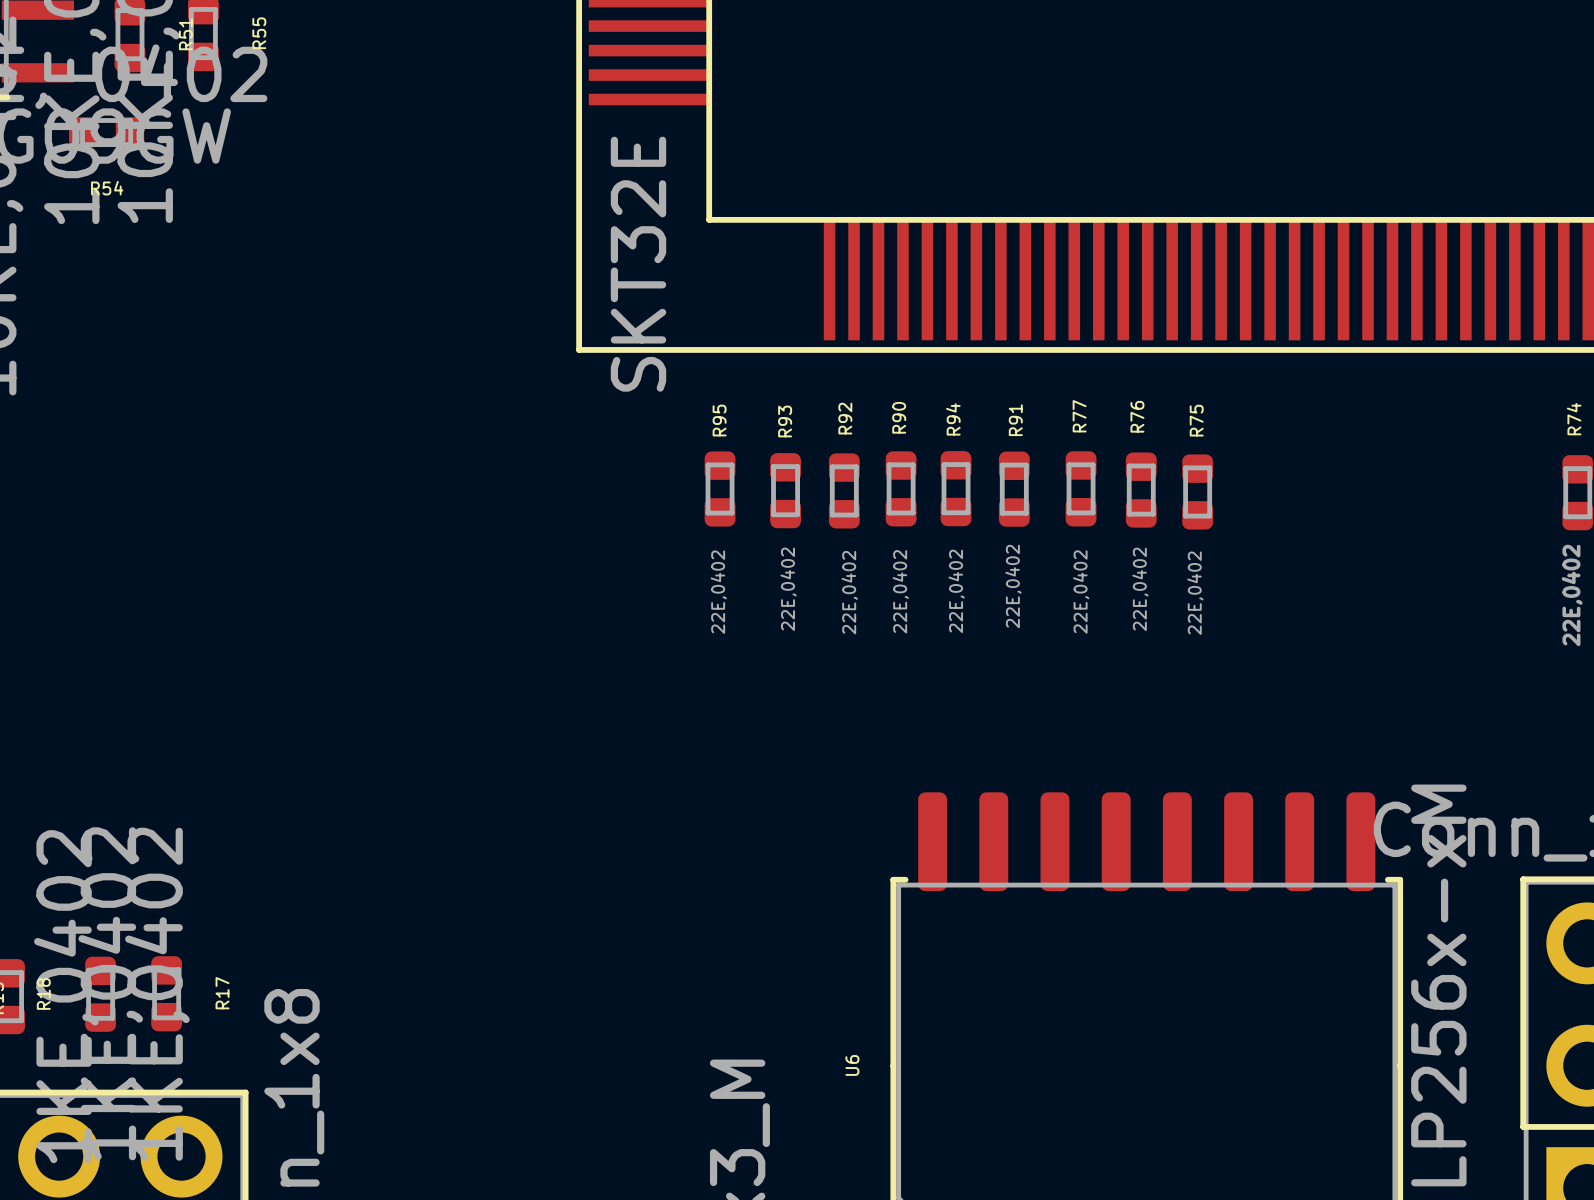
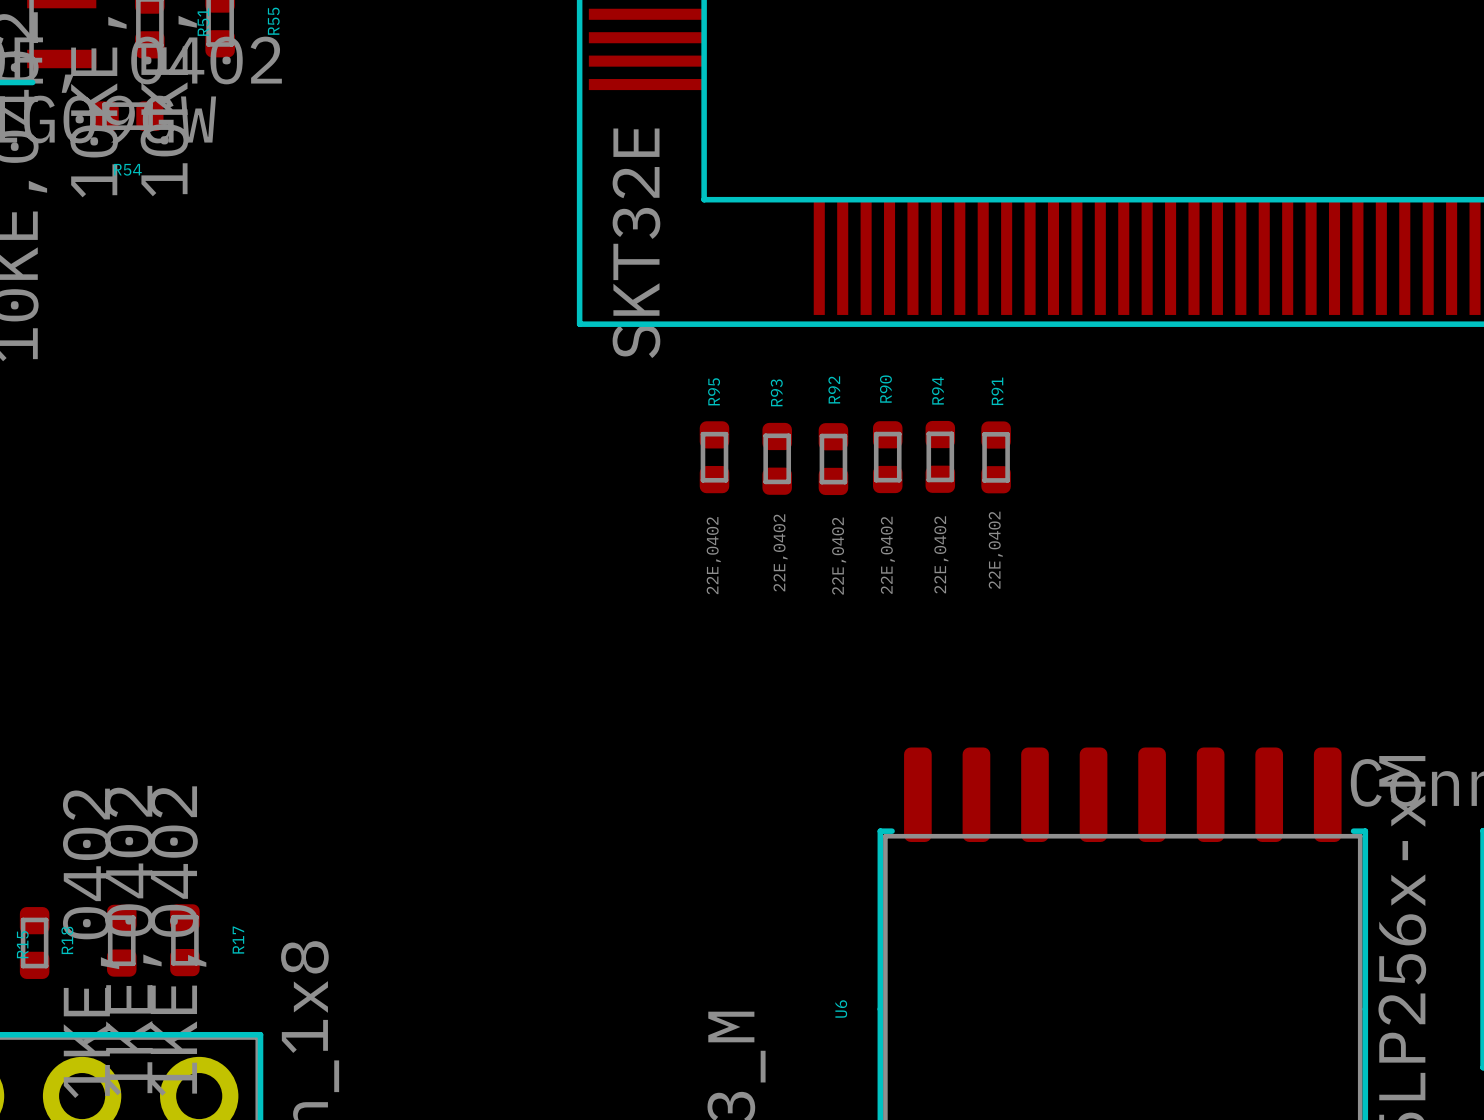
R77: 22E,0402 (1081, 488) -> none
R76: 22E,0402 (1141, 490) -> none
R75: 22E,0402 (1197, 491) -> none

